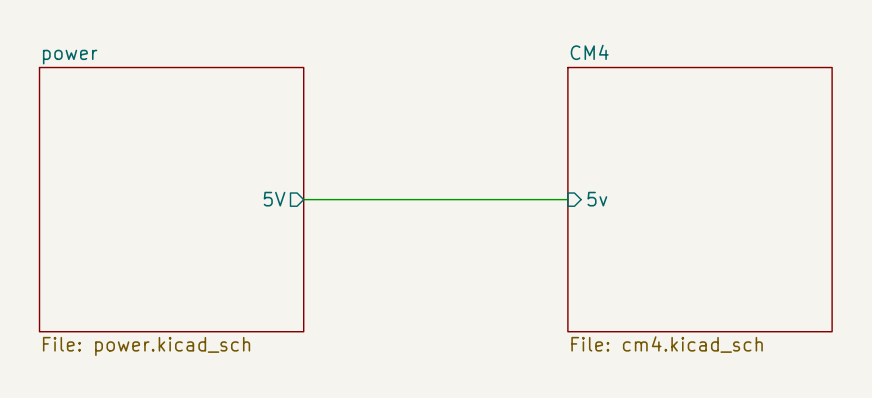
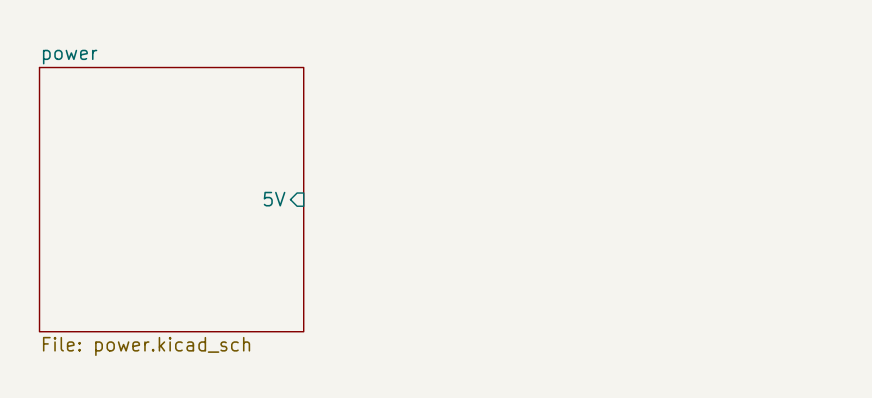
sheet pin shape: output (274, 199) -> input (274, 199)
wire: (303, 199) (567, 199) -> none
sheet pin: 5v (597, 199) -> none
sheet CM4: File: cm4.kicad_sch (700, 199) -> none

